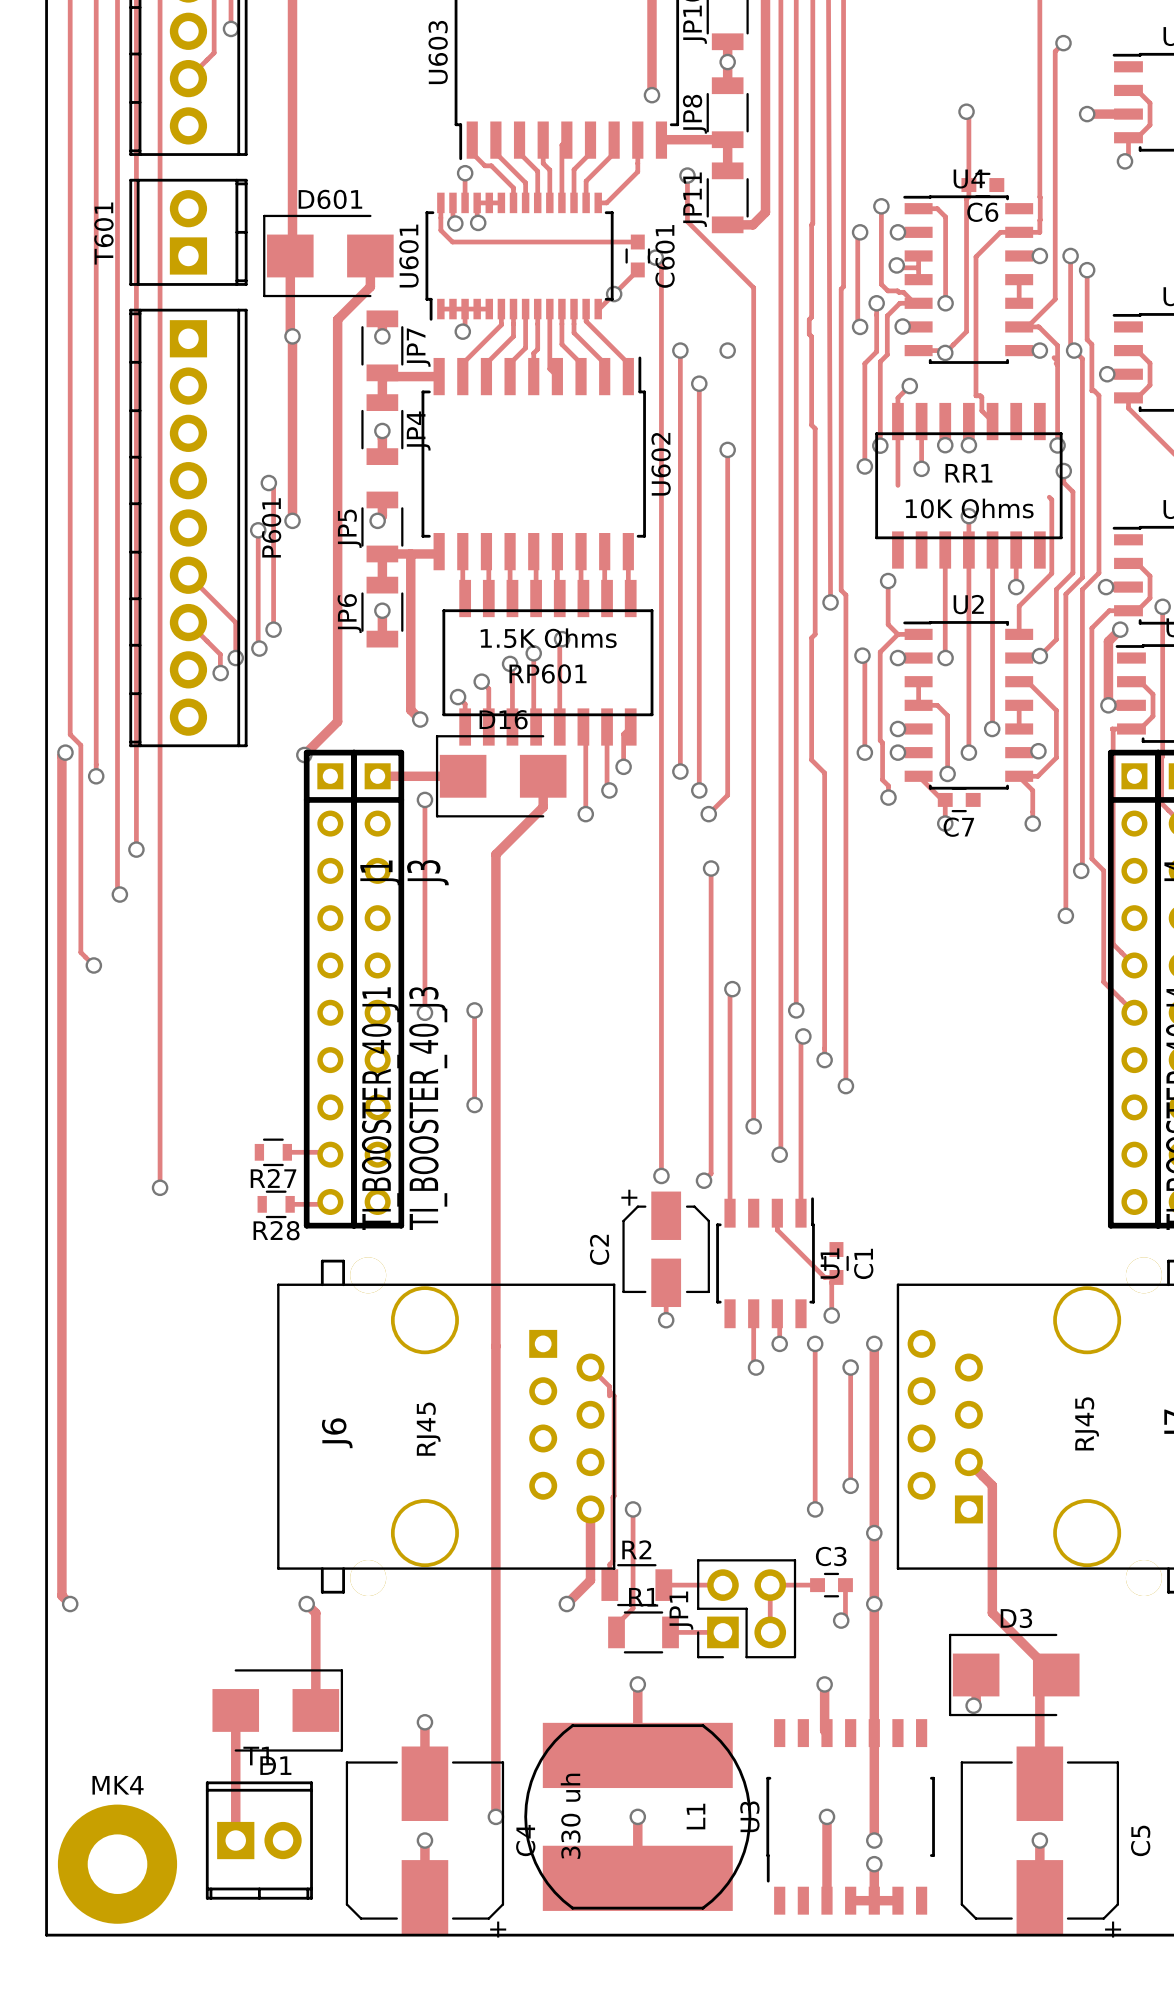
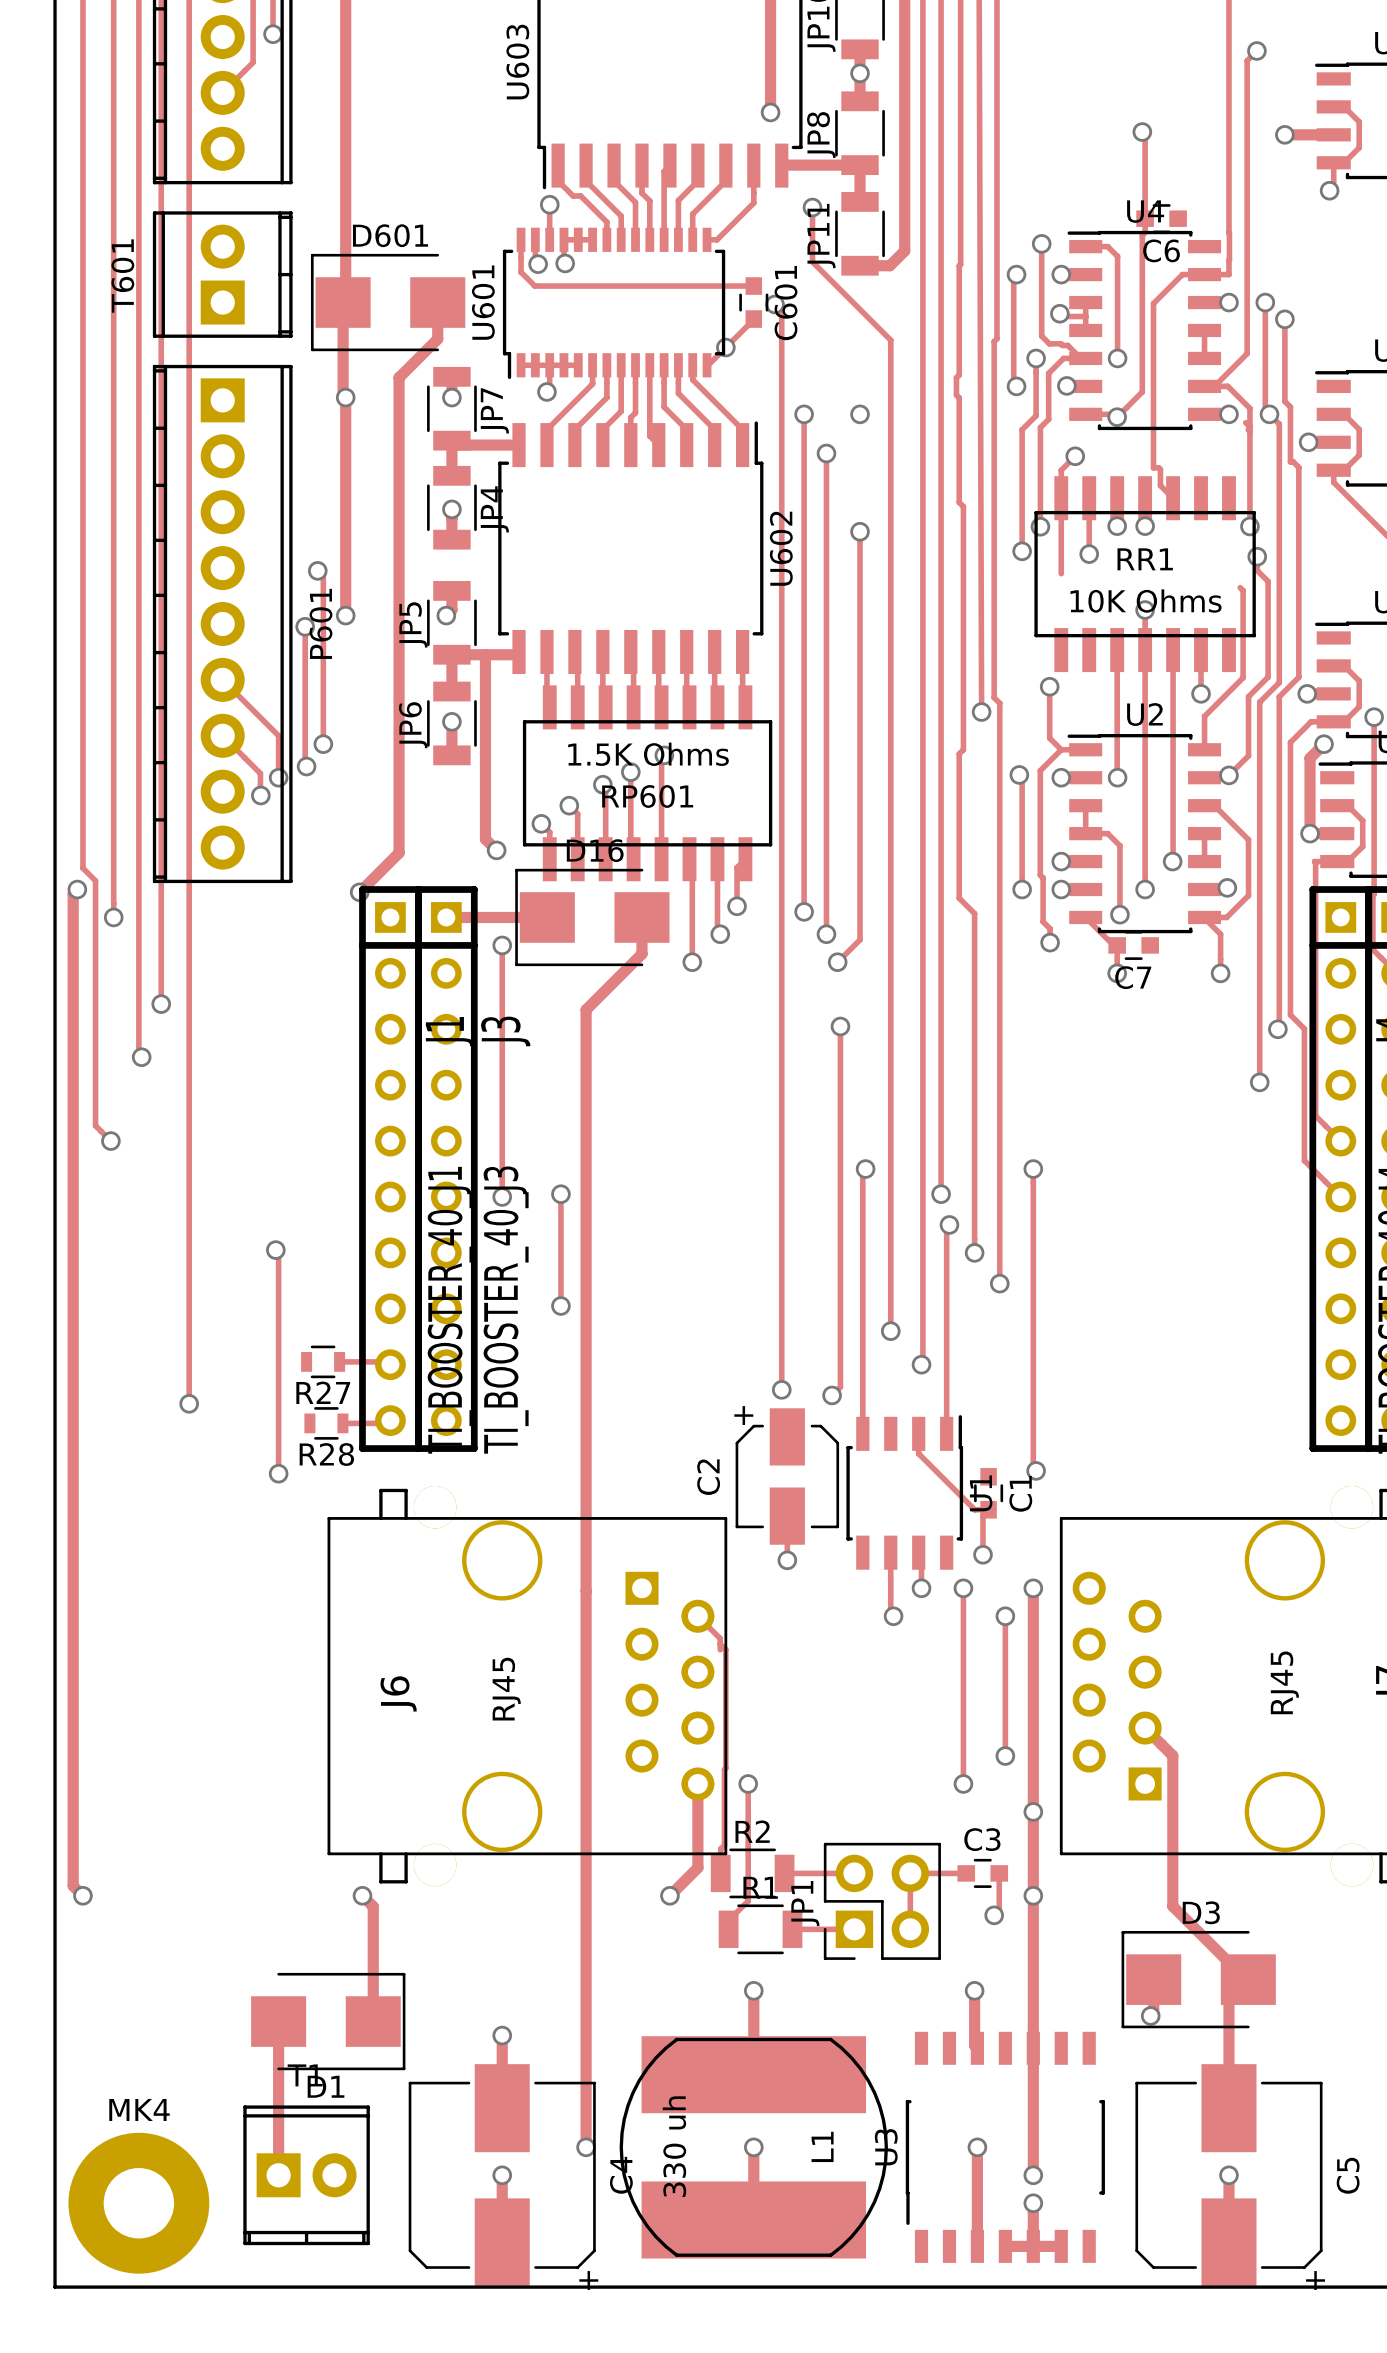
track: none -> (1033, 1169) (1033, 1468) (1036, 1470)
via: none -> (1033, 1169)
track: none -> (275, 1250) (278, 1252) (278, 1473)
via: none -> (275, 1250)
via: none -> (1036, 1470)
via: none -> (278, 1473)

